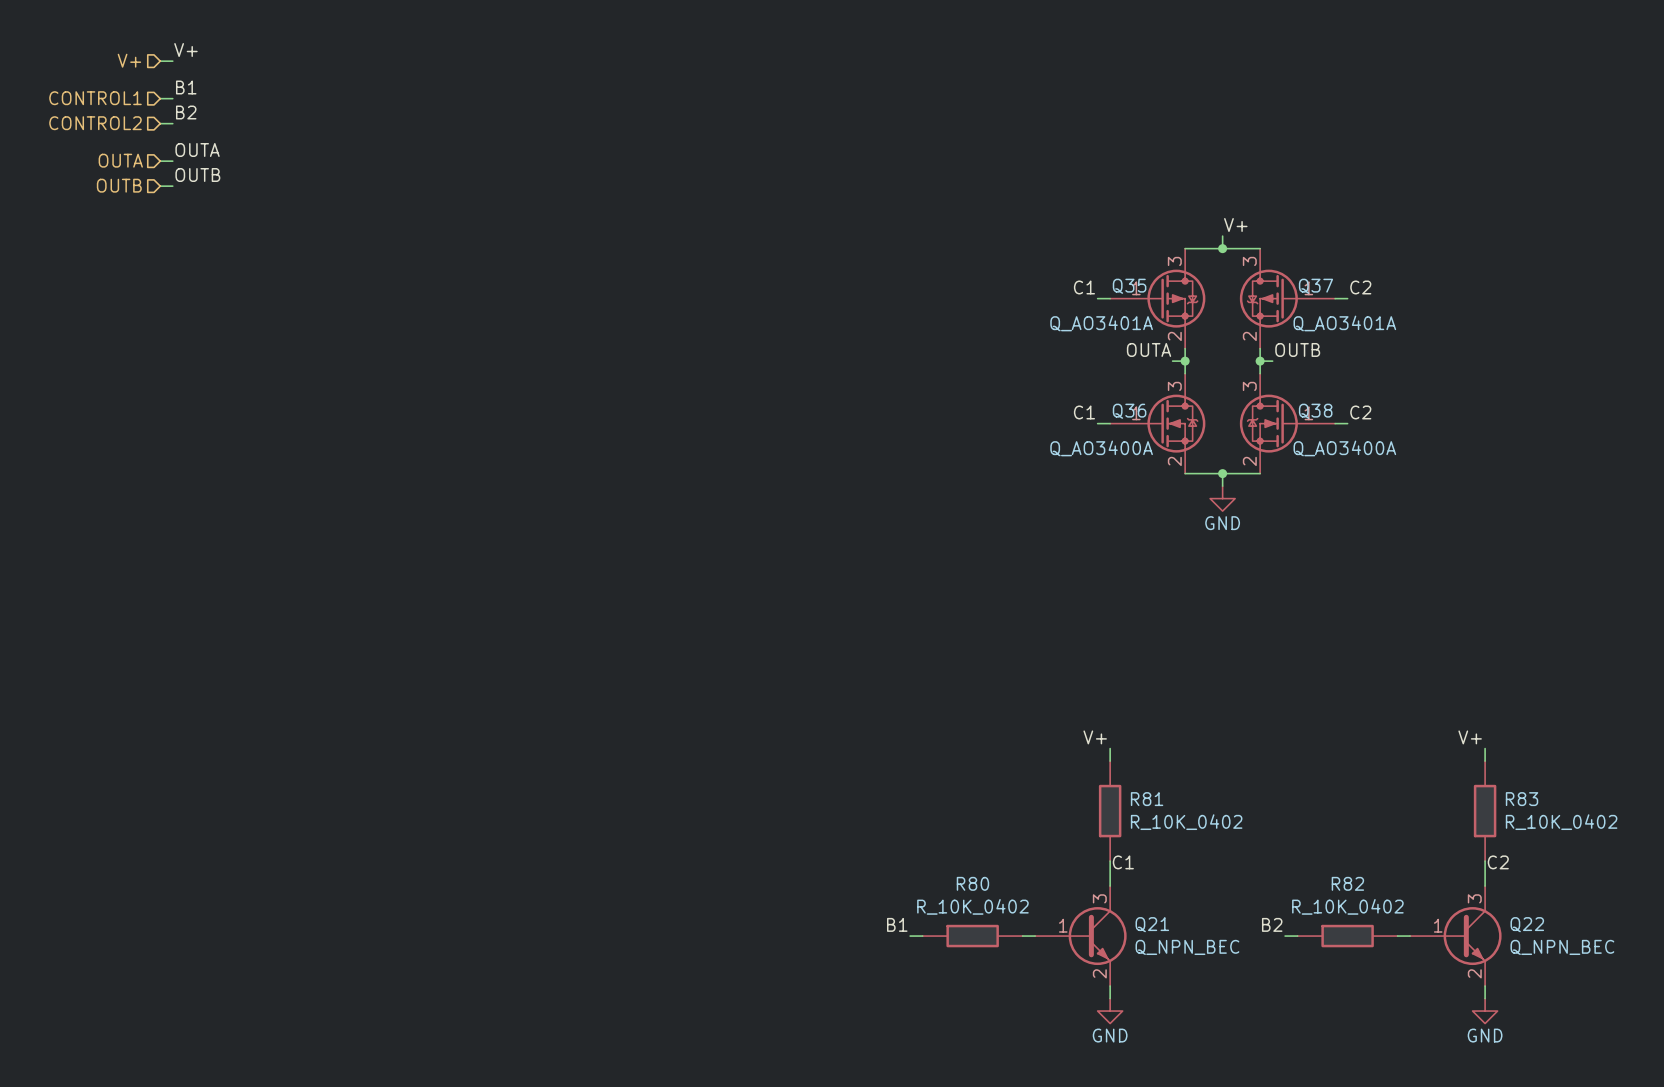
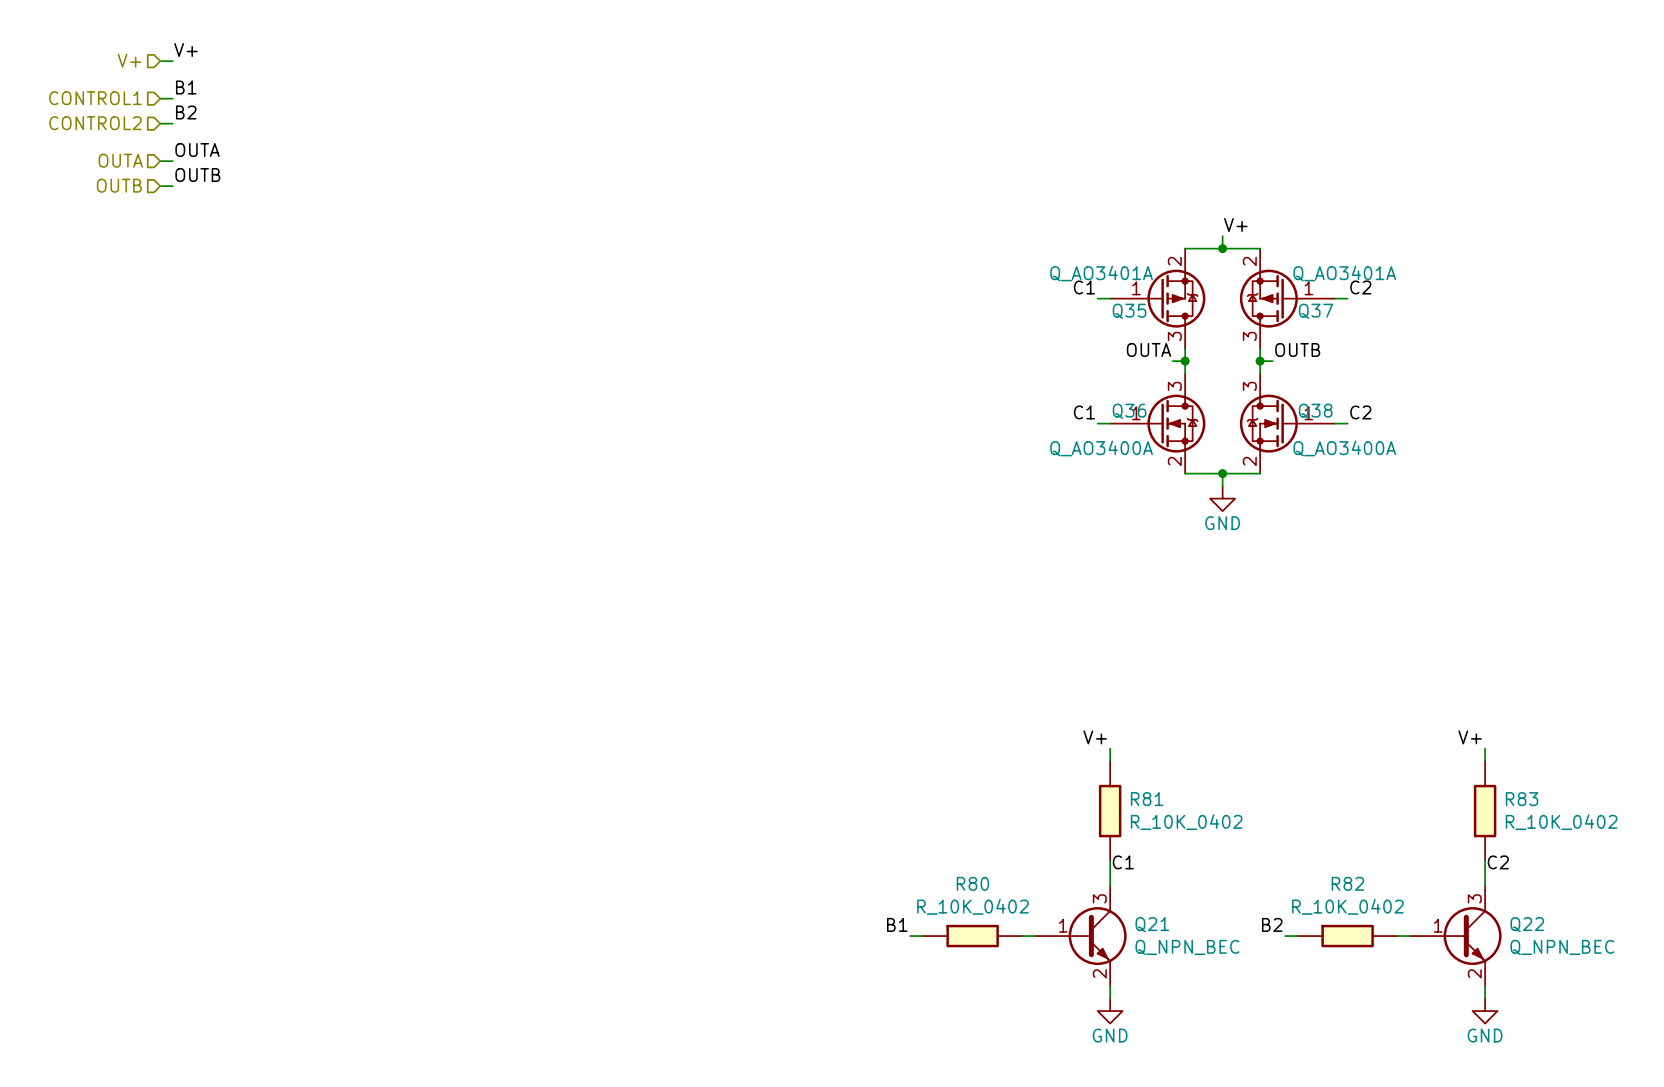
Q35 flip: as is (1176, 298) -> up-down (1176, 298)
Q37 flip: as is (1268, 298) -> up-down (1268, 298)

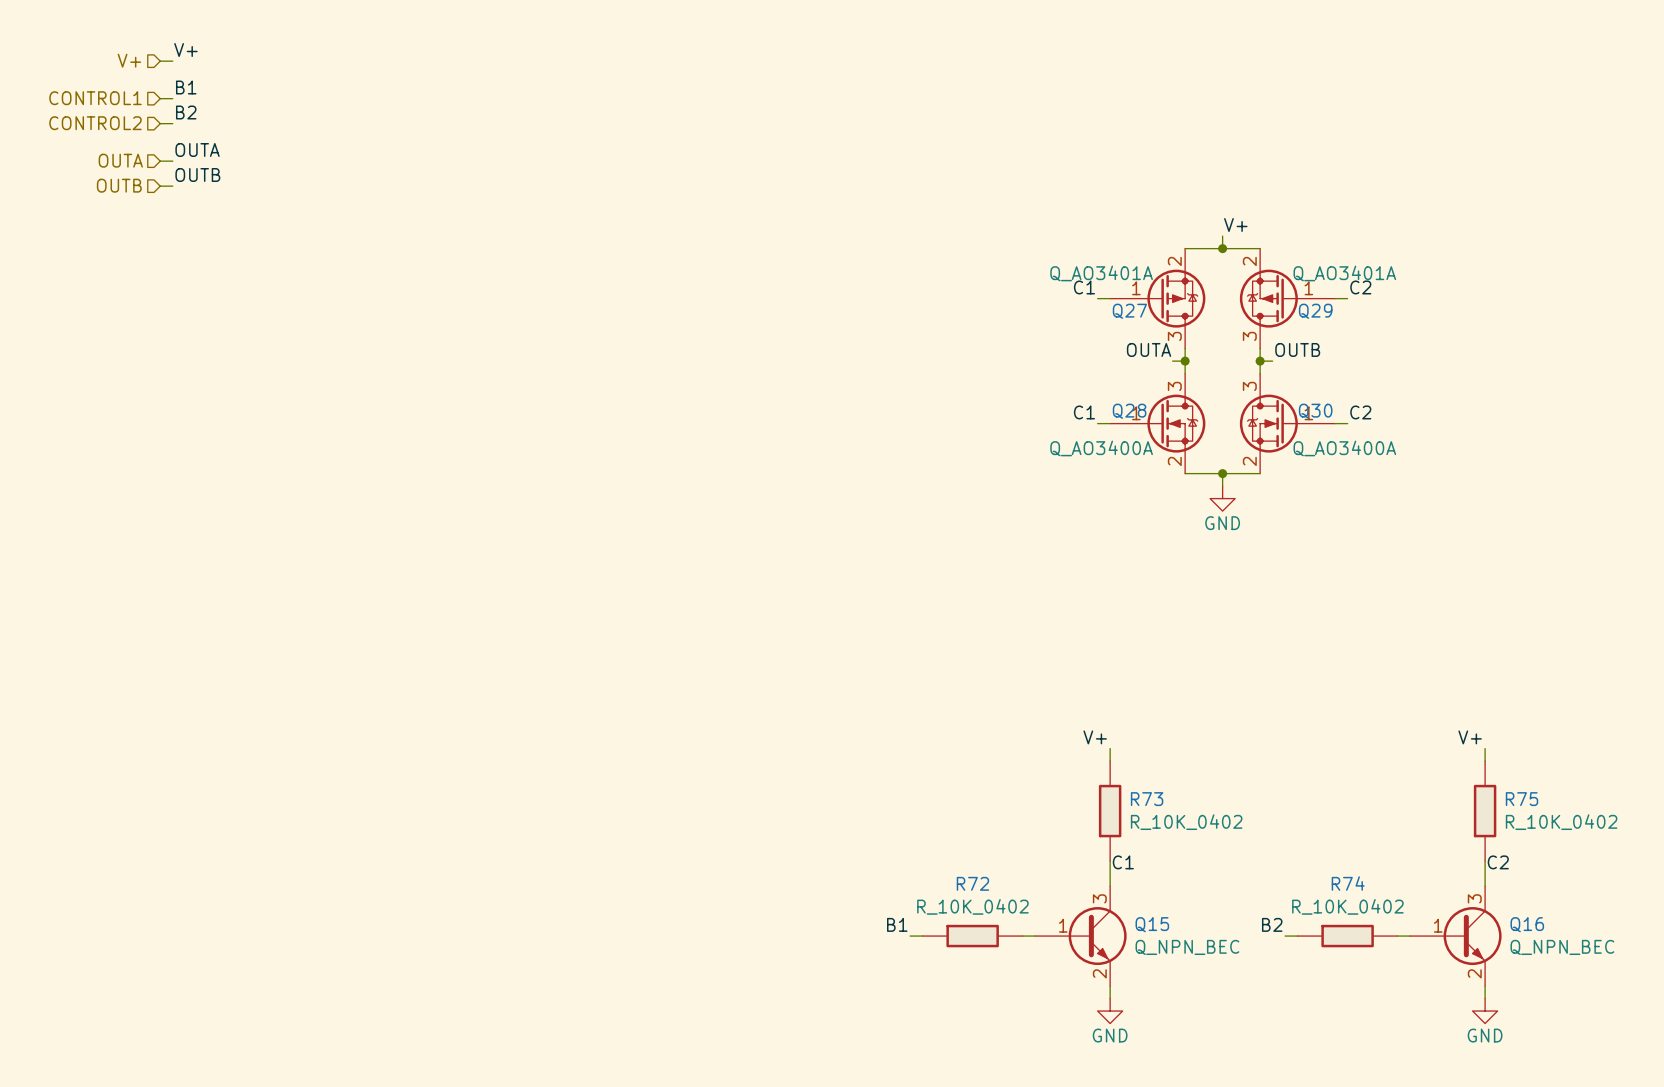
Q35 name: Q35 (1129, 311) -> Q27 (1129, 311)
Q37 name: Q37 (1315, 311) -> Q29 (1315, 311)
Q36 name: Q36 (1129, 411) -> Q28 (1129, 411)
Q38 name: Q38 (1315, 411) -> Q30 (1315, 411)
R81 name: R81 (1147, 799) -> R73 (1147, 799)
R83 name: R83 (1522, 799) -> R75 (1522, 799)
R80 name: R80 (972, 883) -> R72 (972, 883)
R82 name: R82 (1347, 883) -> R74 (1348, 883)
Q21 name: Q21 (1152, 924) -> Q15 (1152, 924)
Q22 name: Q22 (1527, 924) -> Q16 (1527, 924)

